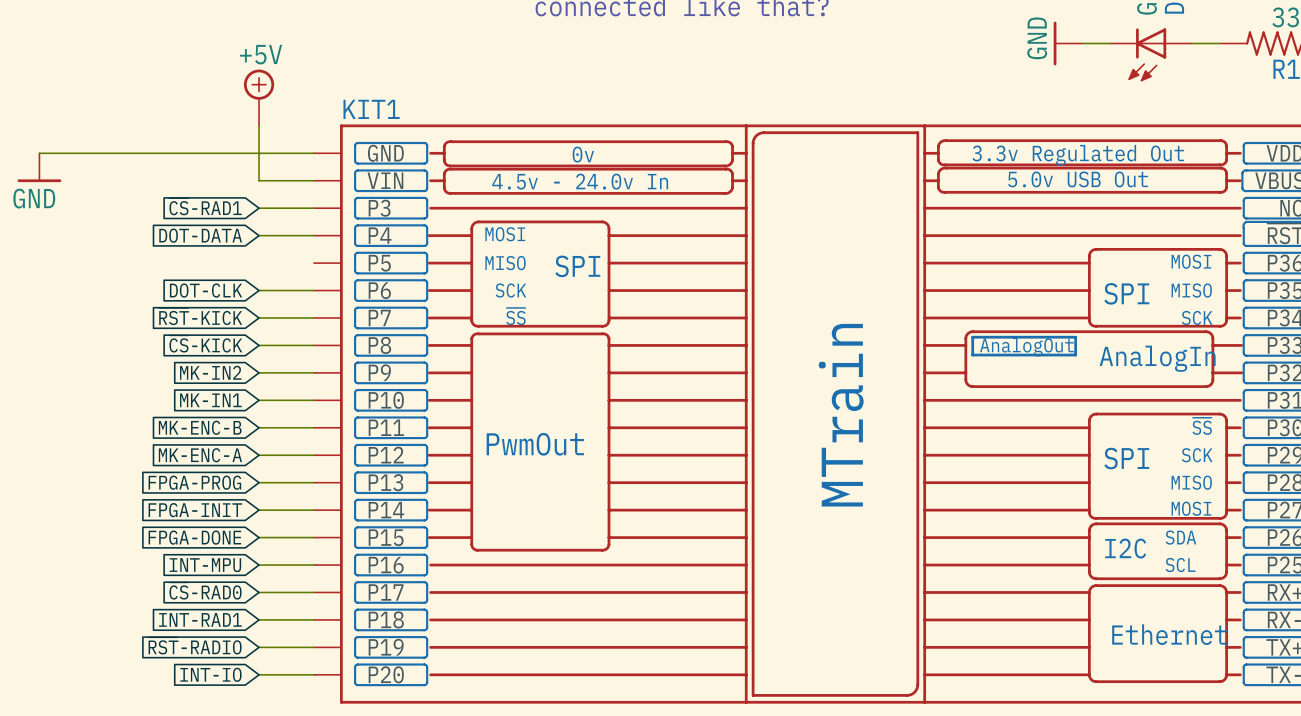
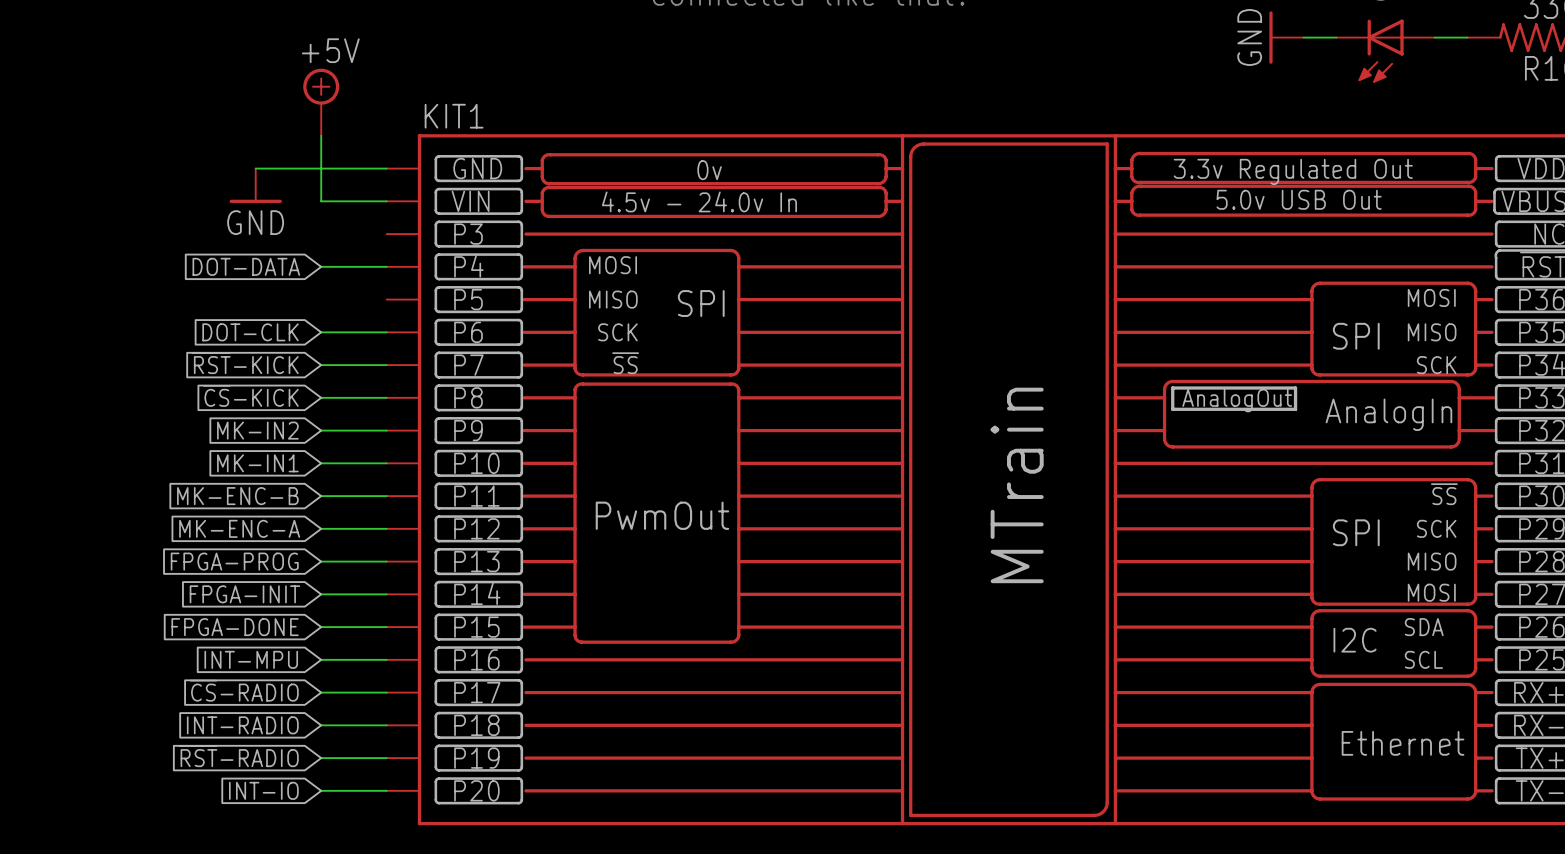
wire: (39, 153) (204, 153) -> none
power symbol position: GND (39, 167) -> GND (255, 185)
global label: ~{CS}-RAD1 (205, 206) -> none
wire: (259, 208) (313, 208) -> none
global label: ~{CS}-RAD0 (205, 591) -> ~{CS}-RADIO (244, 690)
global label: INT-RAD1 (200, 619) -> INT-RADIO (242, 725)

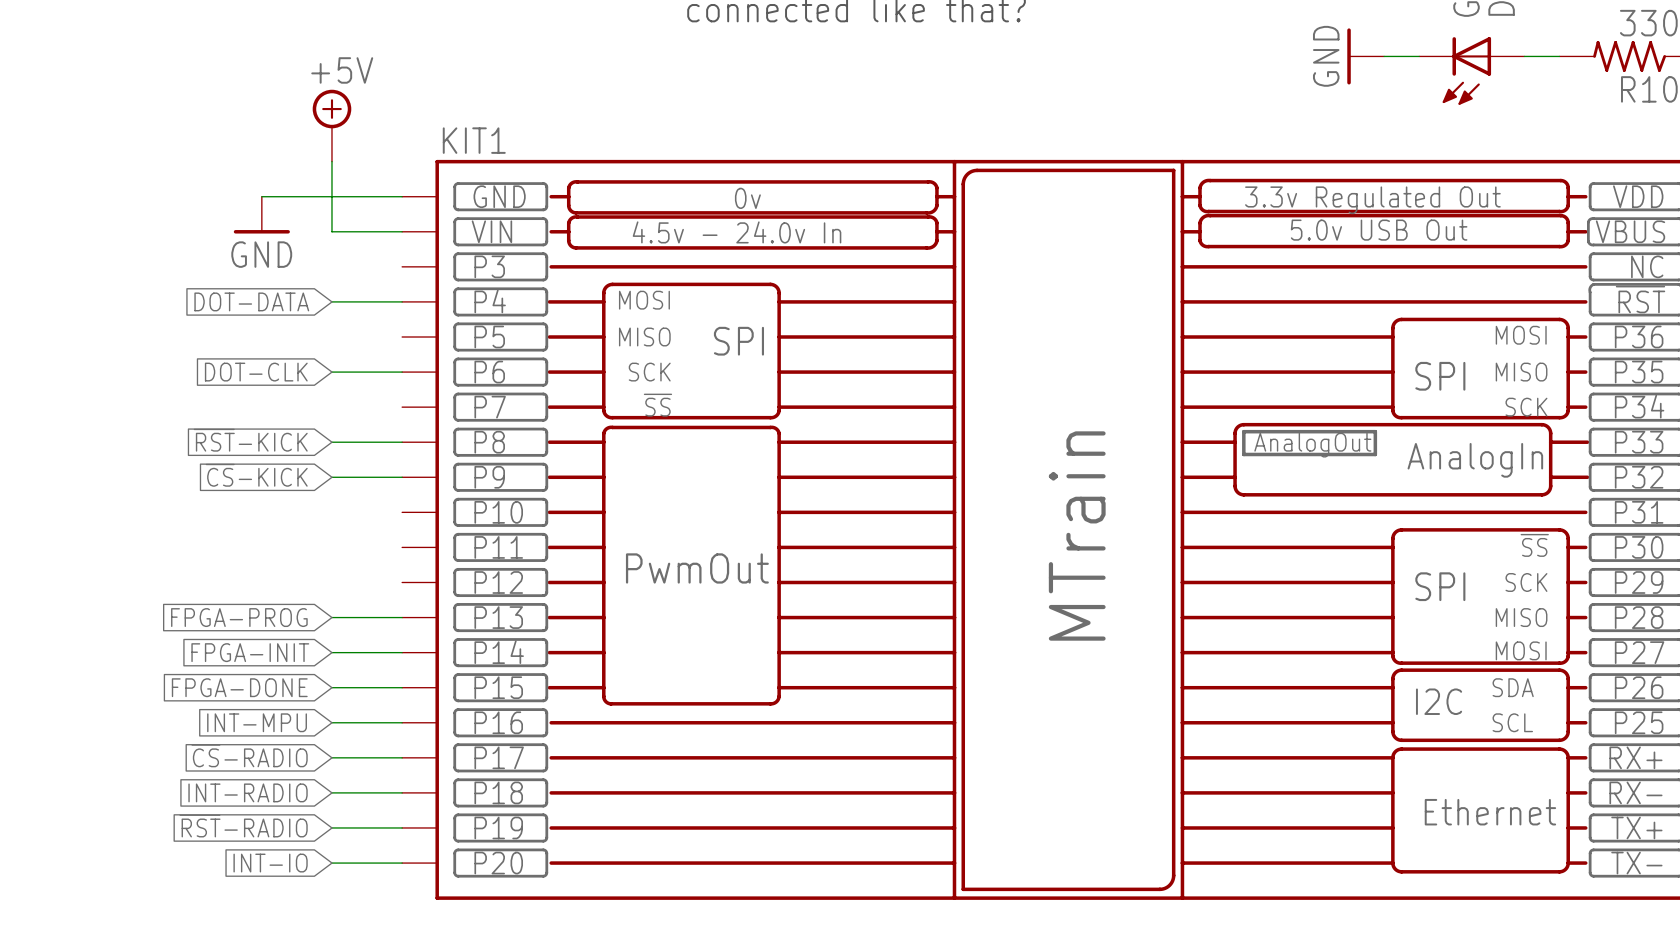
global label: ~{RST}-KICK (245, 363) -> none
wire: (321, 365) (386, 365) -> none
global label: ~{CS}-KICK (250, 395) -> ~{RST}-KICK (250, 440)
global label: MK-IN2 (257, 430) -> ~{CS}-KICK (256, 475)
global label: MK-IN1 (257, 463) -> none
wire: (321, 463) (386, 463) -> none
global label: MK-ENC-B (237, 496) -> none
wire: (321, 496) (386, 496) -> none
global label: MK-ENC-A (239, 528) -> none
wire: (321, 528) (386, 528) -> none

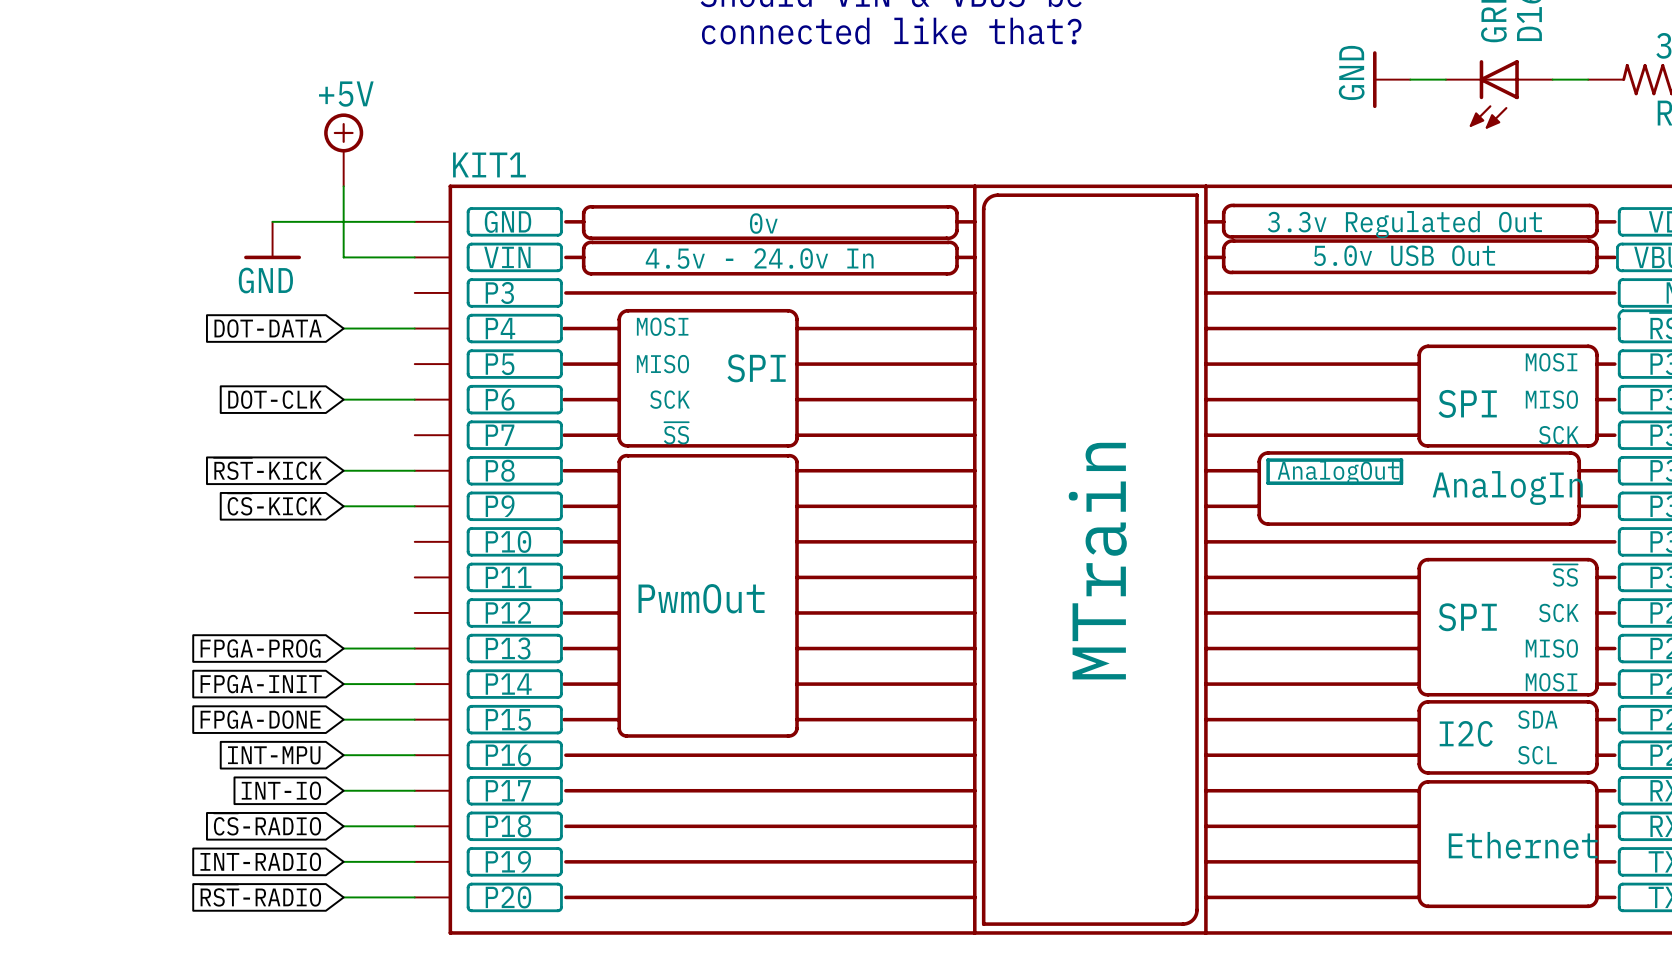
global label: ~{CS}-RADIO (249, 755) -> INT-IO (281, 790)
global label: INT-RADIO (248, 792) -> ~{CS}-RADIO (267, 824)
global label: ~{RST}-RADIO (243, 825) -> INT-RADIO (260, 861)
global label: INT-IO (270, 863) -> ~{RST}-RADIO (260, 895)

